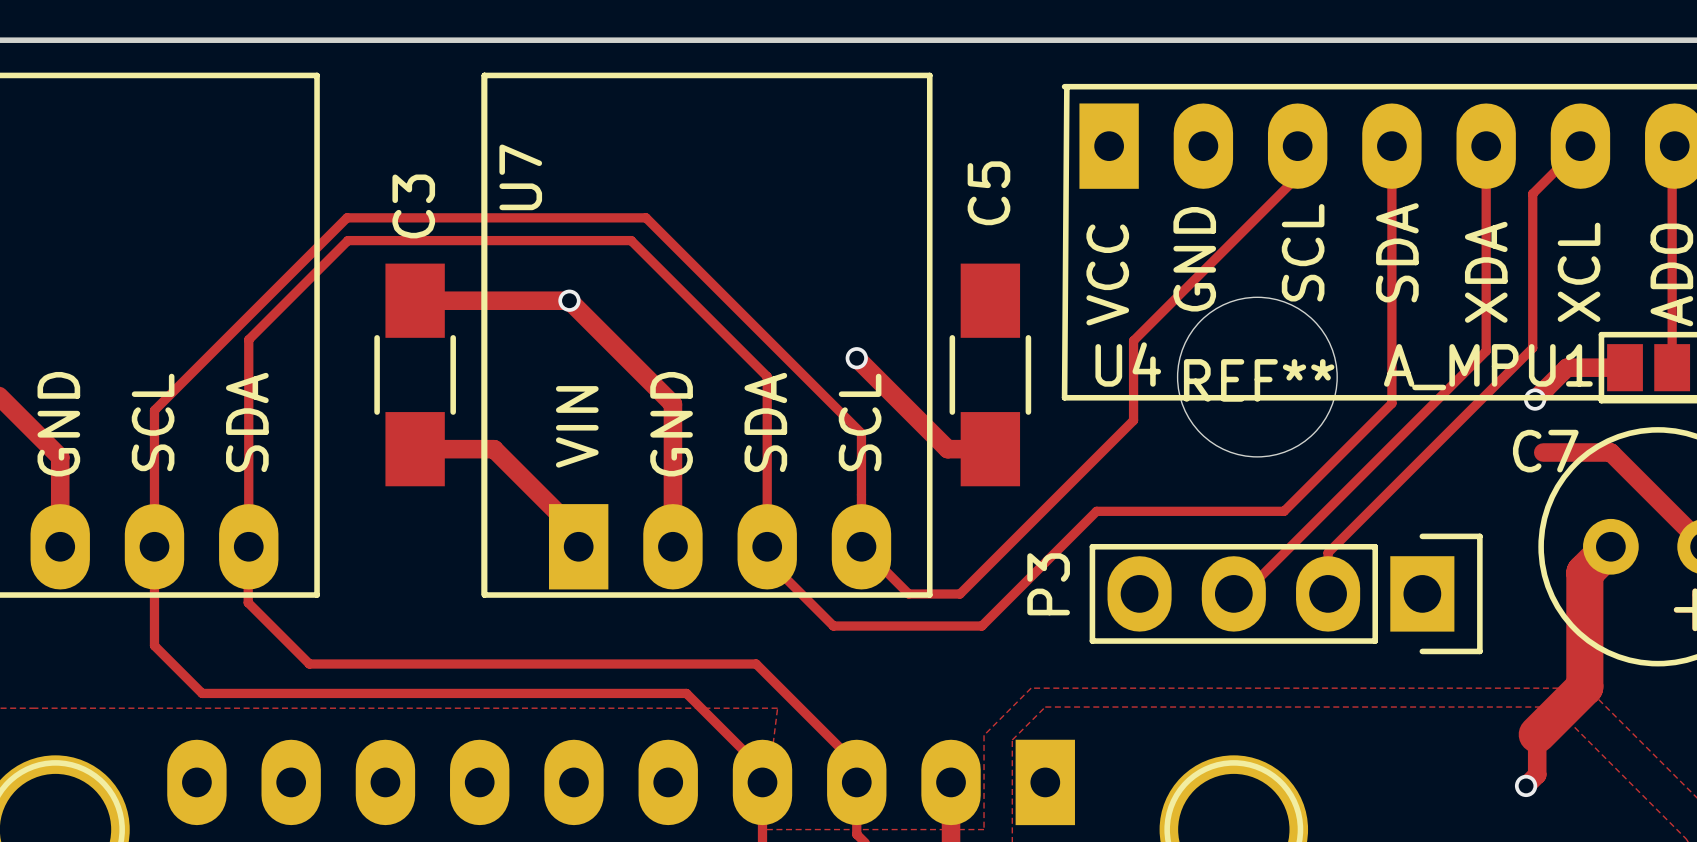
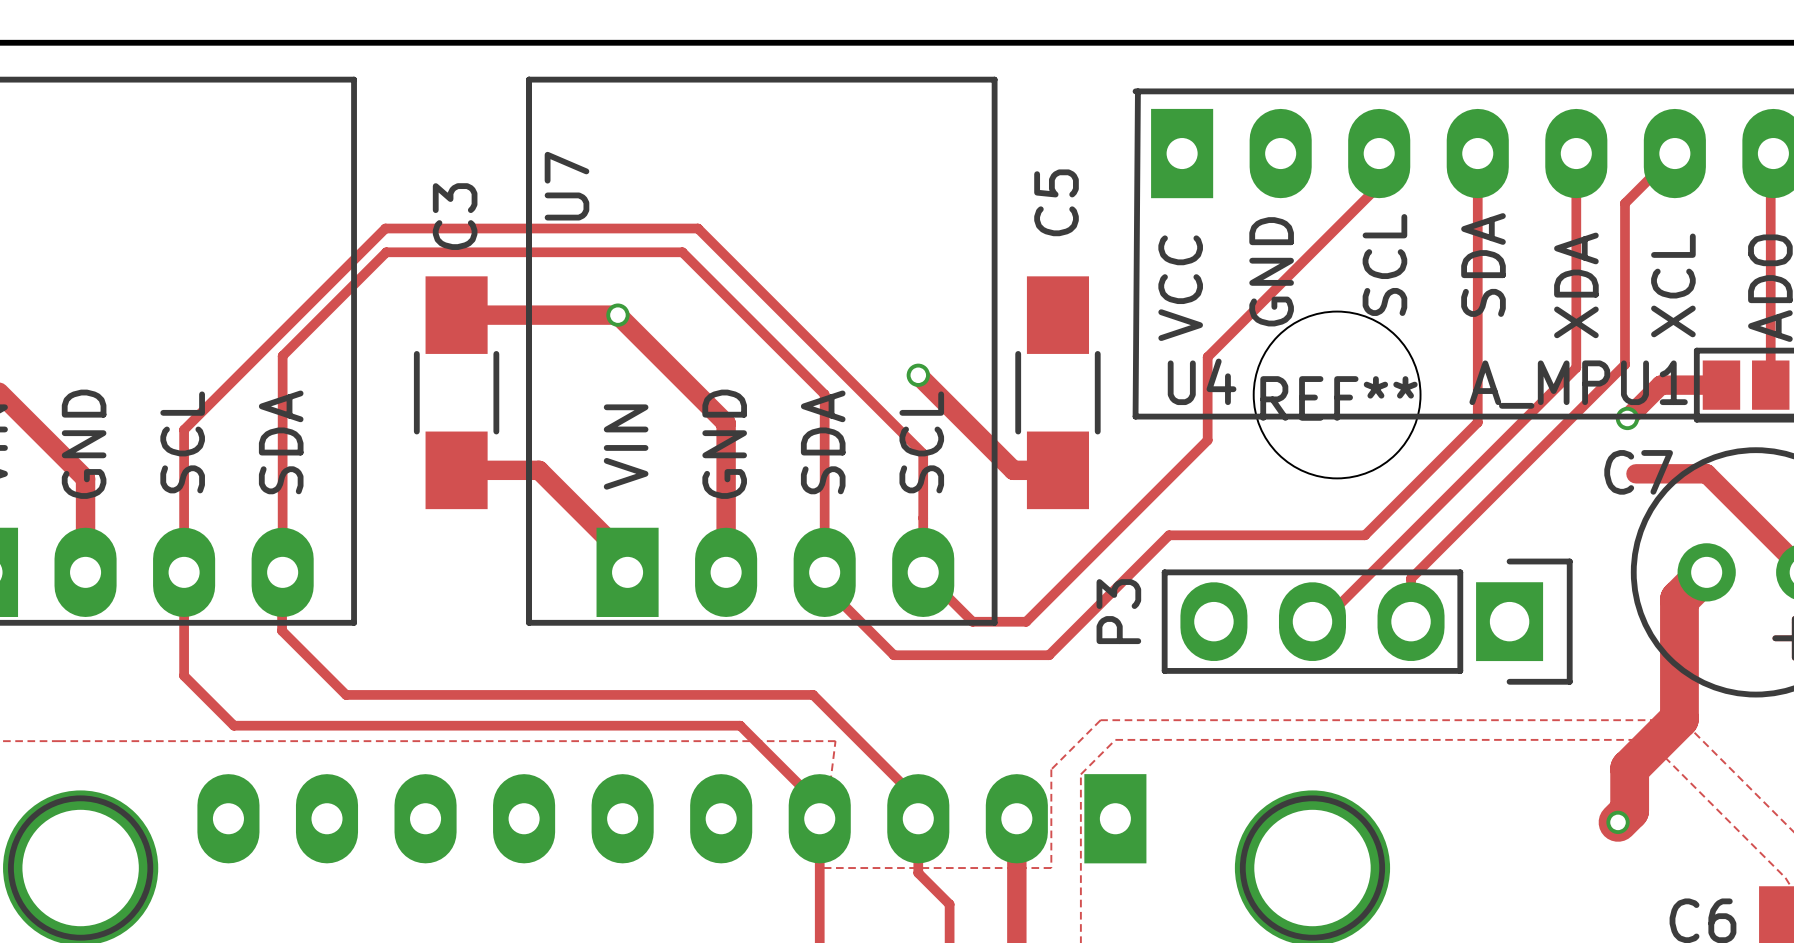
track width: thin (1537, 734) (1537, 774) (1526, 785) -> thick (1629, 768) (1629, 810) (1618, 822)

